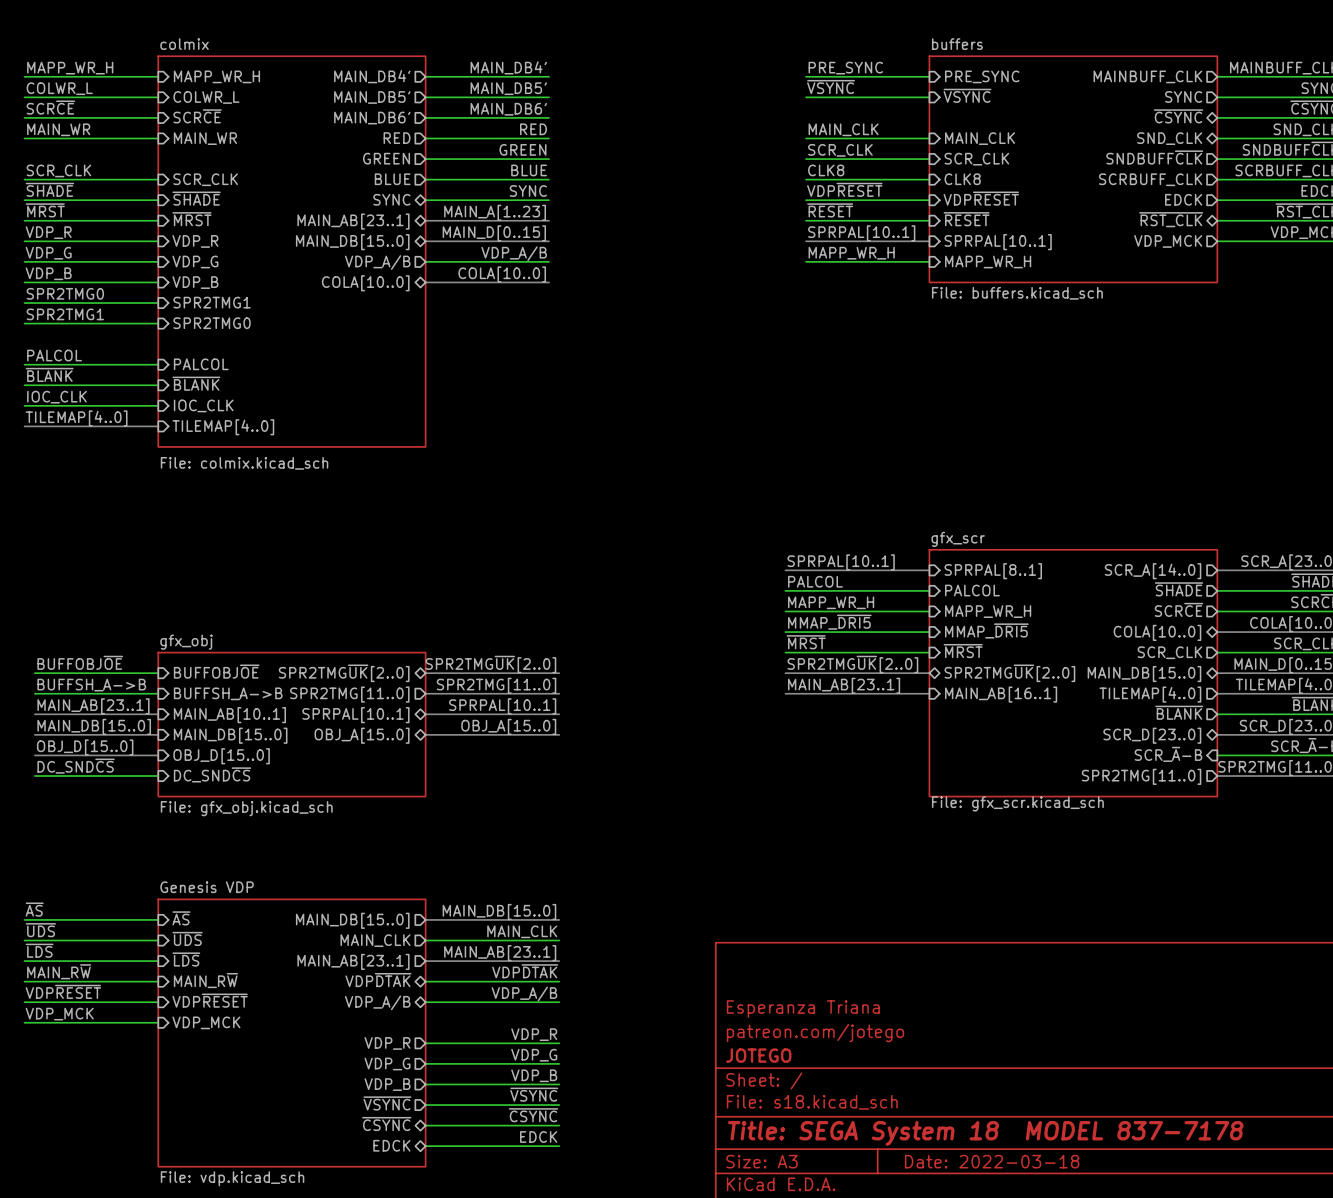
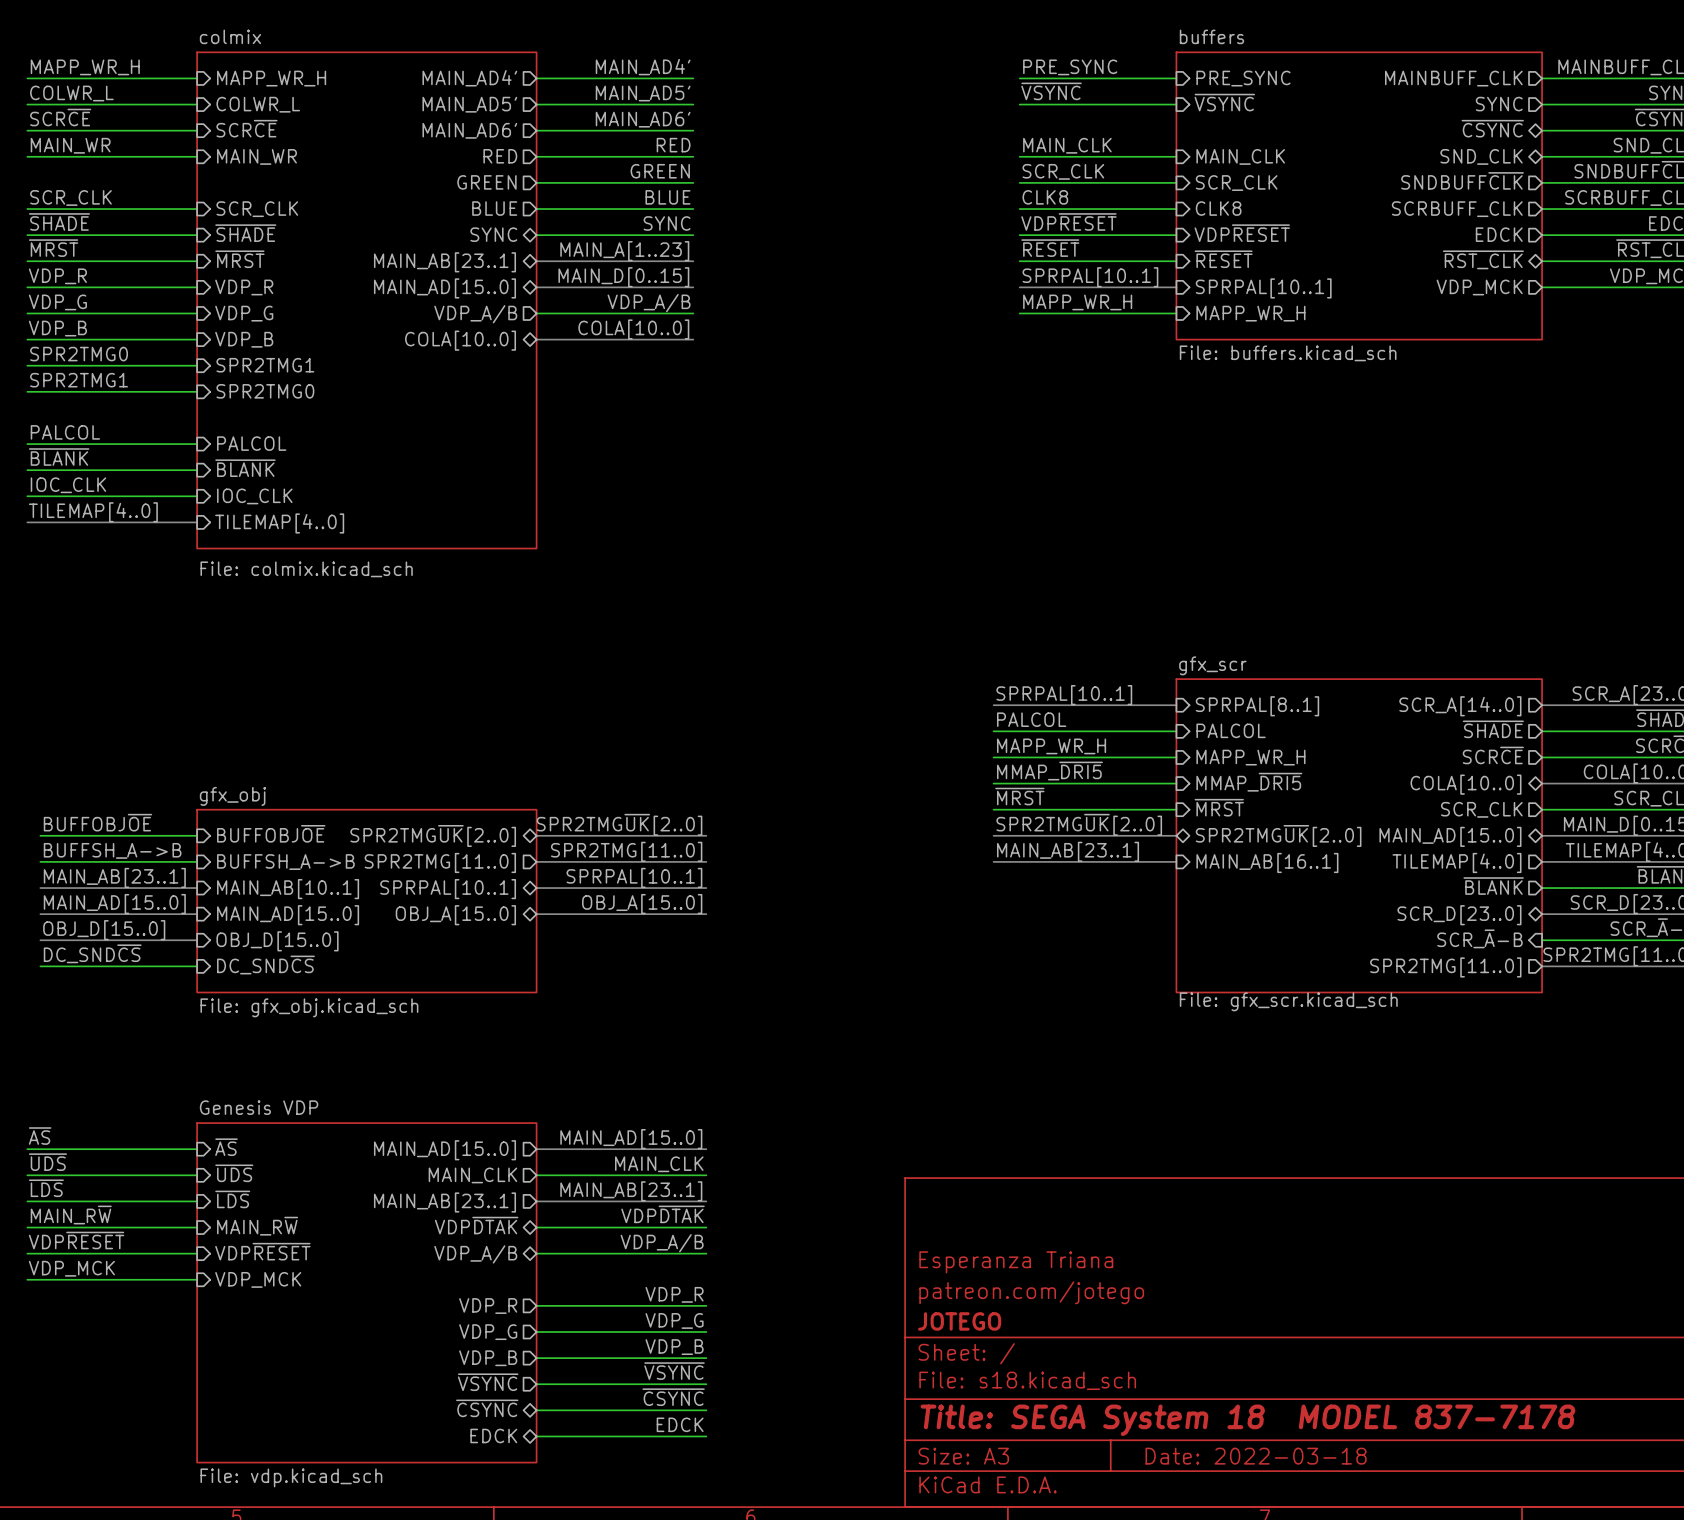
label: MAIN_DB4' (508, 67) -> MAIN_AD4' (643, 67)
sheet pin: MAIN_DB4' (372, 76) -> MAIN_AD4' (469, 78)
label: MAIN_DB5' (508, 88) -> MAIN_AD5' (643, 93)
sheet pin: MAIN_DB5' (372, 97) -> MAIN_AD5' (469, 104)
label: MAIN_DB6' (508, 109) -> MAIN_AD6' (643, 119)
sheet pin: MAIN_DB6' (372, 118) -> MAIN_AD6' (469, 130)
sheet pin: MAIN_DB[15..0] (352, 242) -> MAIN_AD[15..0] (444, 288)
sheet pin: MAIN_DB[15..0] (1144, 674) -> MAIN_AD[15..0] (1450, 836)
label: MAIN_DB[15..0] (94, 726) -> MAIN_AD[15..0] (114, 904)
sheet pin: MAIN_DB[15..0] (230, 735) -> MAIN_AD[15..0] (288, 915)
label: MAIN_DB[15..0] (499, 912) -> MAIN_AD[15..0] (631, 1139)
sheet pin: MAIN_DB[15..0] (352, 920) -> MAIN_AD[15..0] (444, 1150)

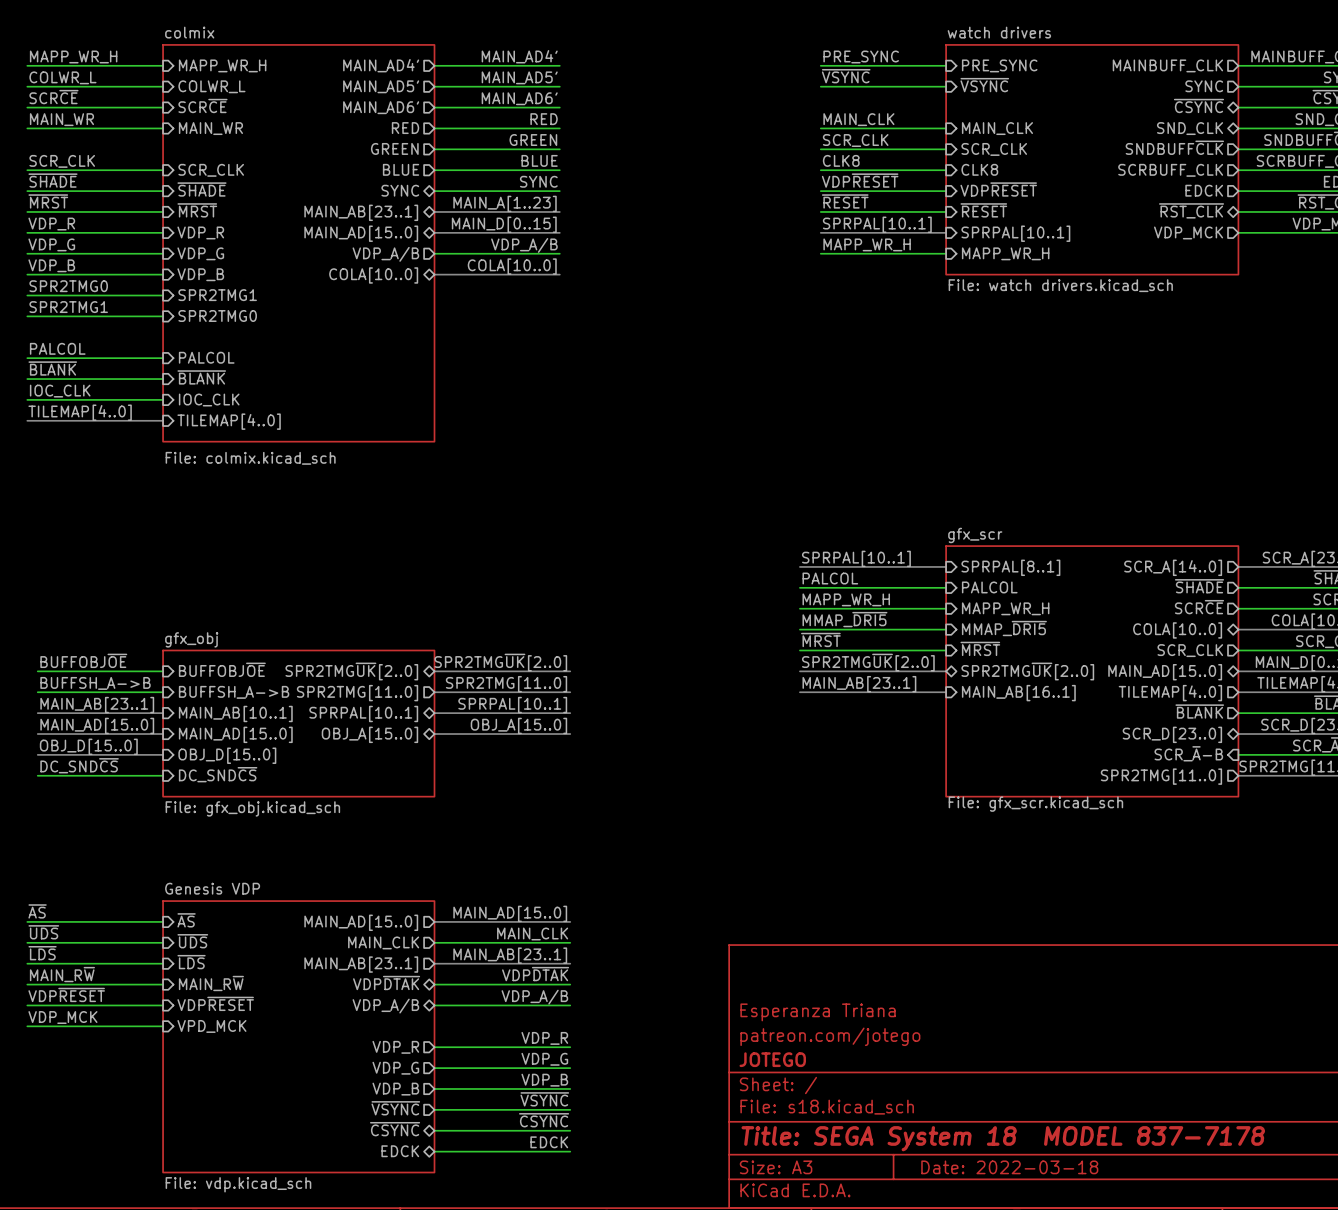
sheet buffers name: buffers (1211, 36) -> watch drivers (999, 32)
sheet buffers value: File: buffers.kicad_sch (1288, 353) -> File: watch drivers.kicad_sch (1060, 285)
sheet pin: VDP_MCK (258, 1279) -> VPD_MCK (211, 1026)

